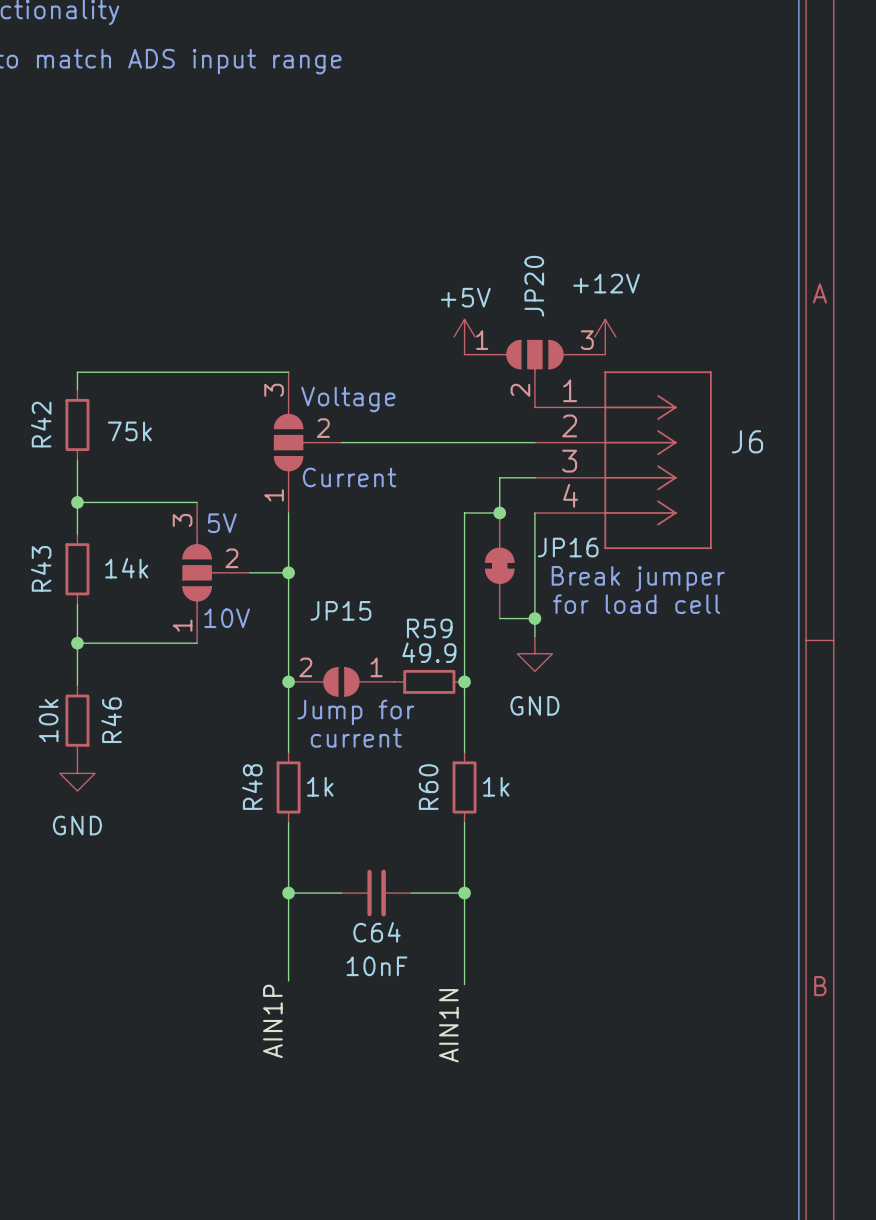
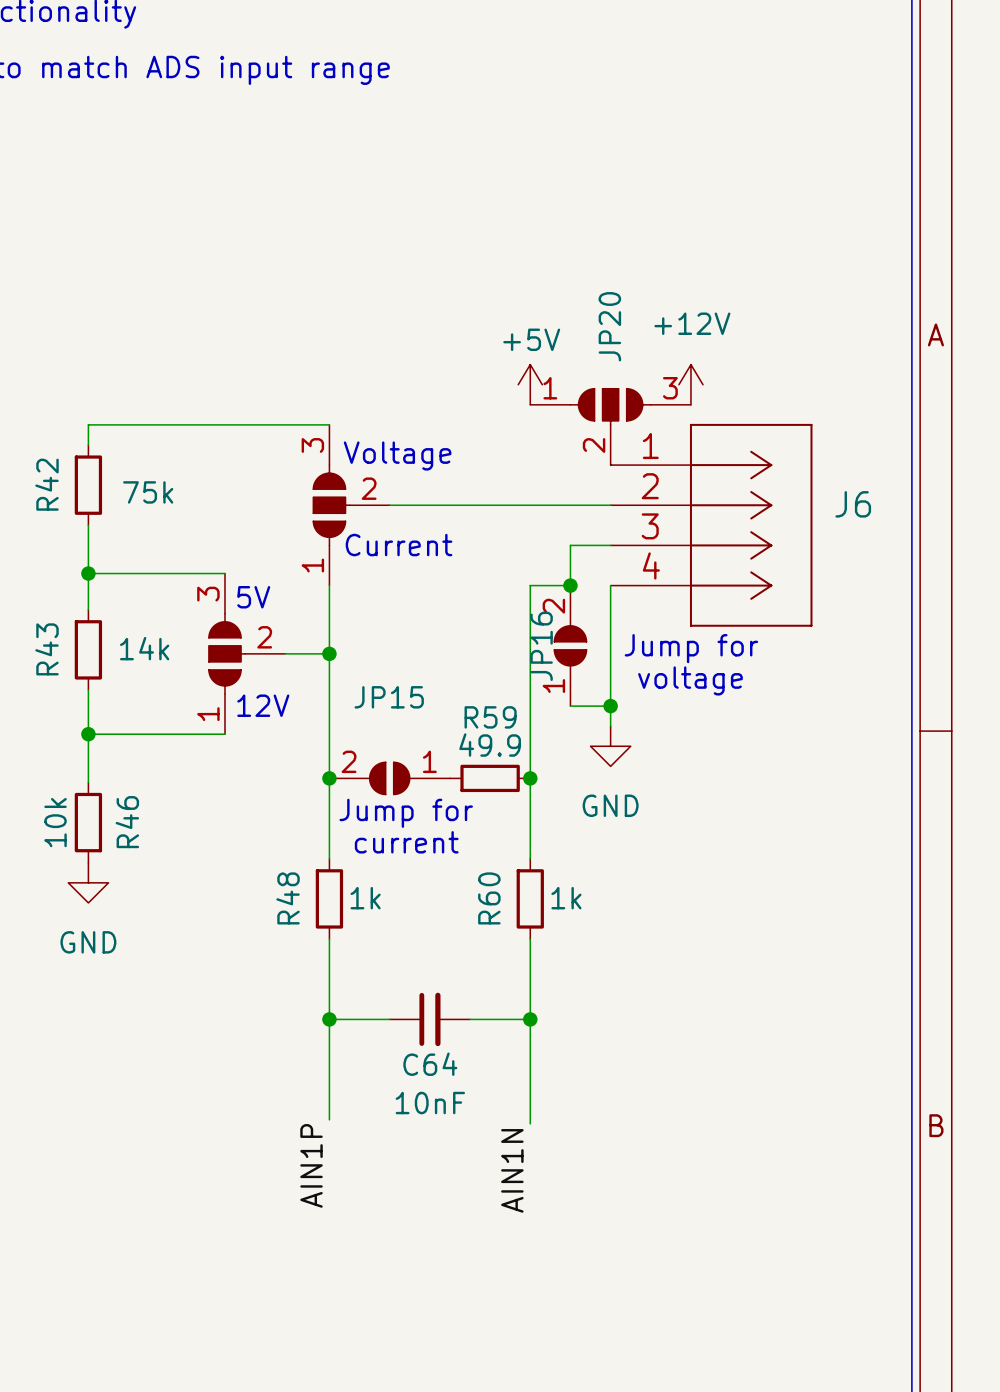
JP16 symbol: [485, 512, 514, 619] -> [554, 585, 587, 707]
JP16 name position: JP16 (568, 547) -> JP16 (541, 646)
text: none -> Jump for (691, 648)
text: Break jumper (638, 578) -> none
text: none -> voltage (690, 680)
text: for load cell (636, 604) -> none
text: 10V (227, 618) -> 12V (263, 705)

